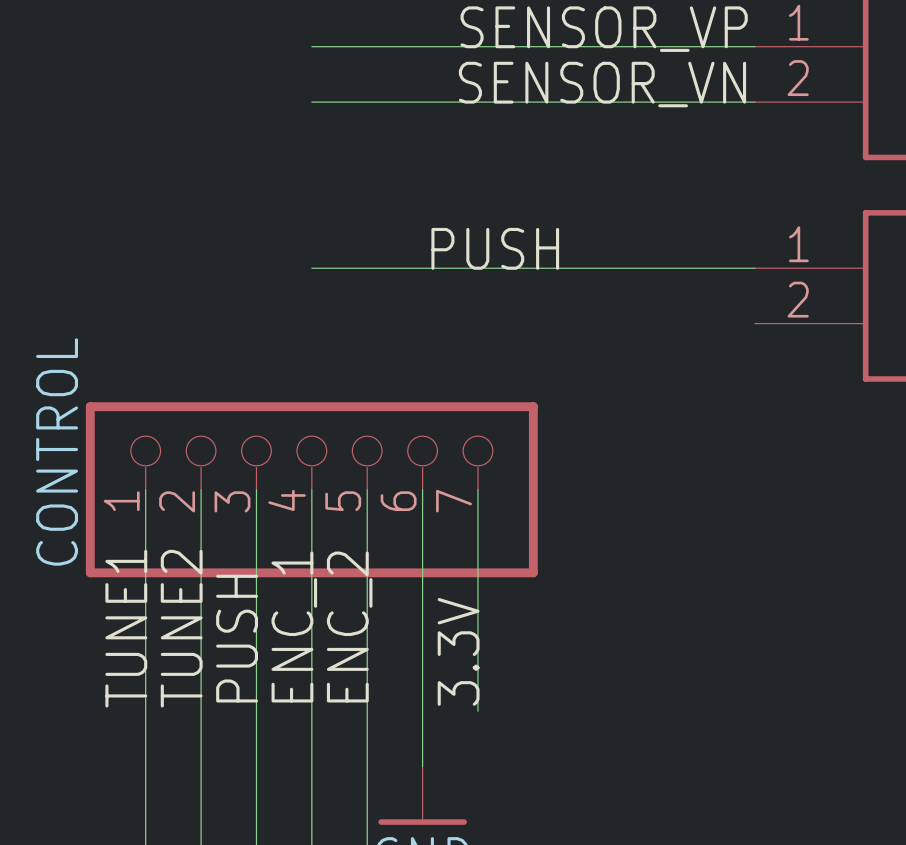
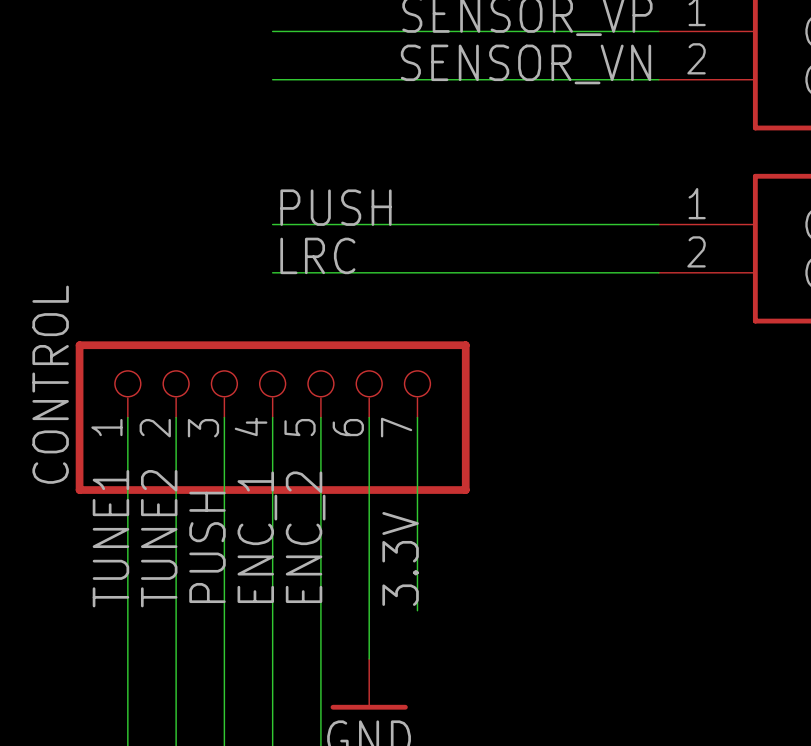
label position: PUSH (495, 248) -> PUSH (335, 207)
label: none -> LRC (317, 255)
wire: none -> (272, 272) (658, 272)

